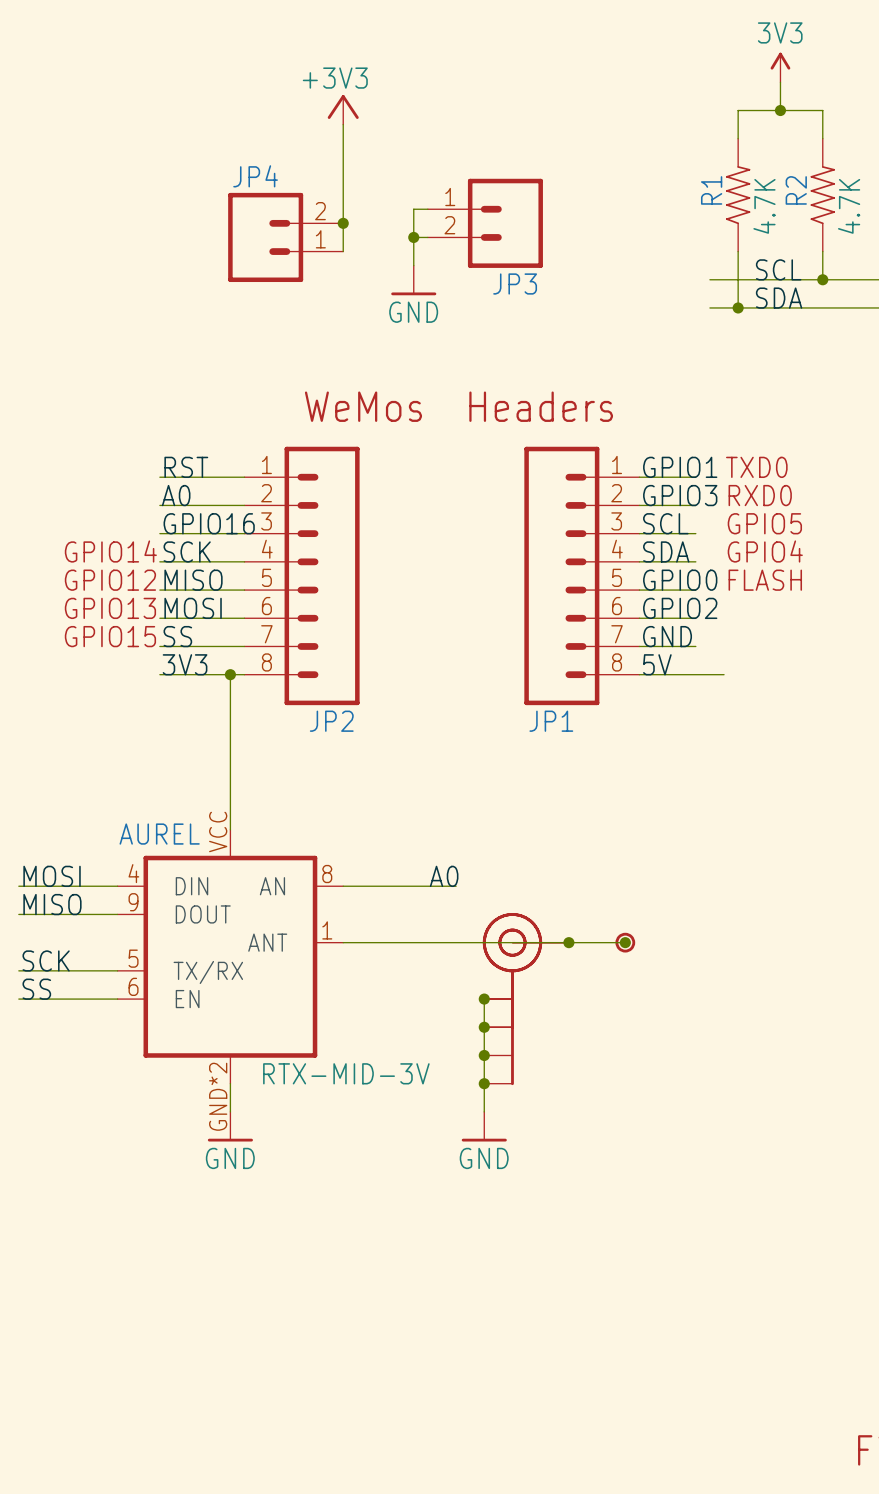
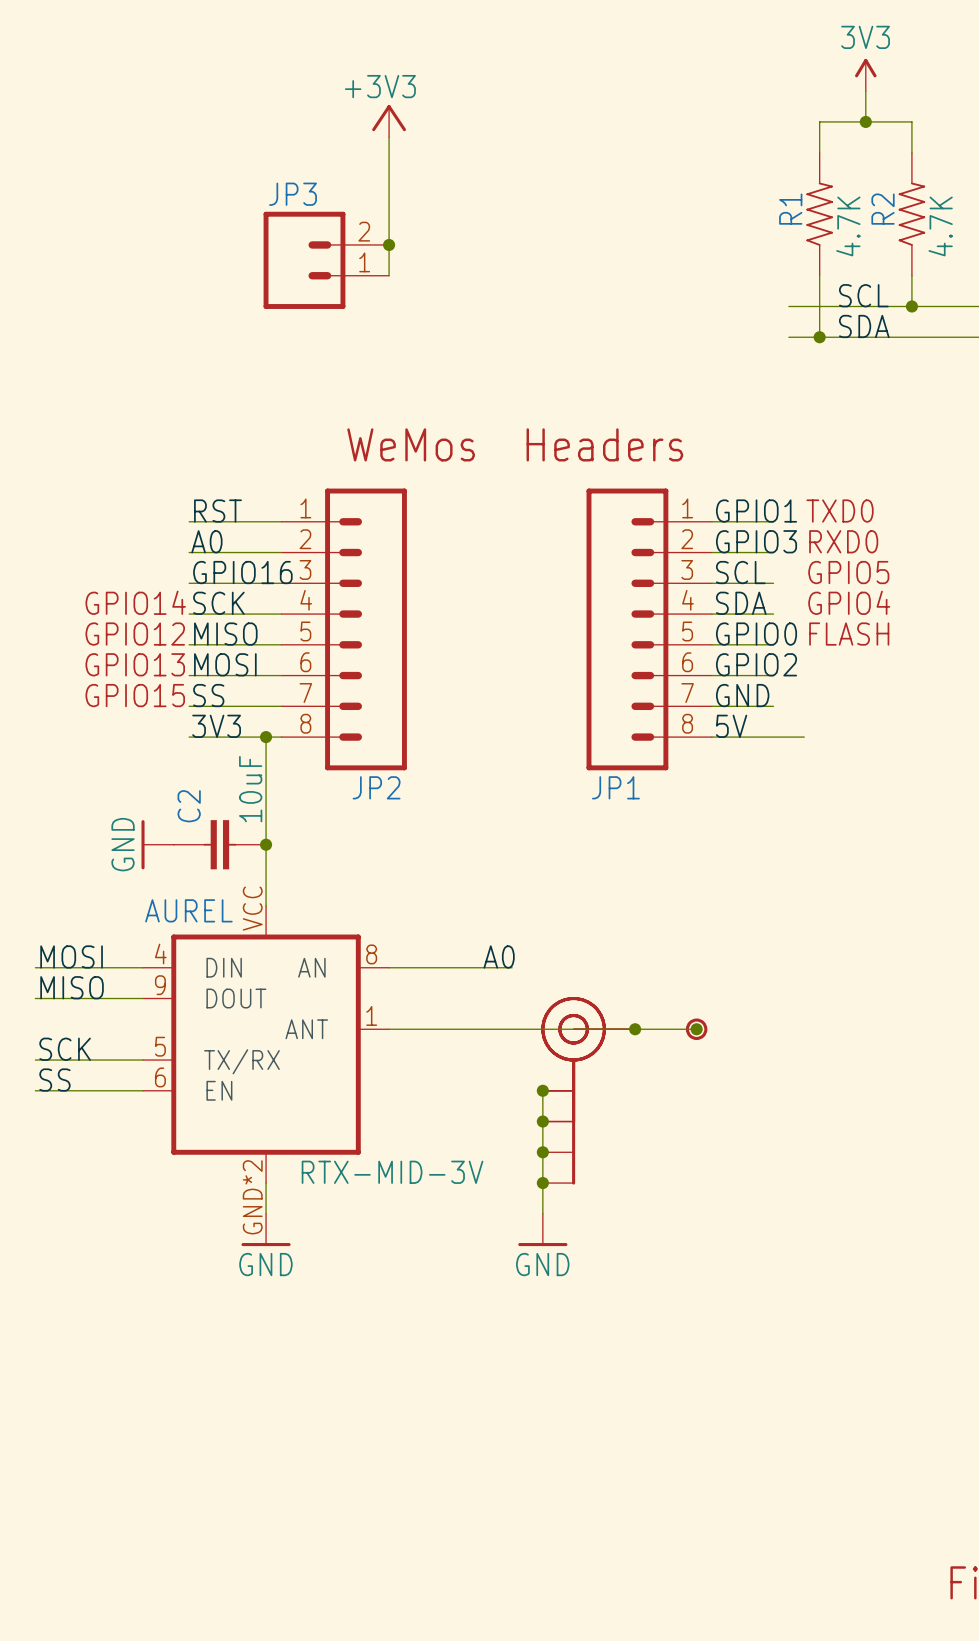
JP4 name: JP4 (255, 176) -> JP3 (293, 194)
wire: (427, 209) (413, 209) (413, 265) -> none
JP3: (485, 223) -> none
wire: (413, 237) (427, 237) -> none
junction: (413, 237) -> none
power symbol: GND (413, 280) -> none
power symbol: none -> GND (157, 844)
C2: none -> 10uF (219, 844)
junction: none -> (266, 844)

